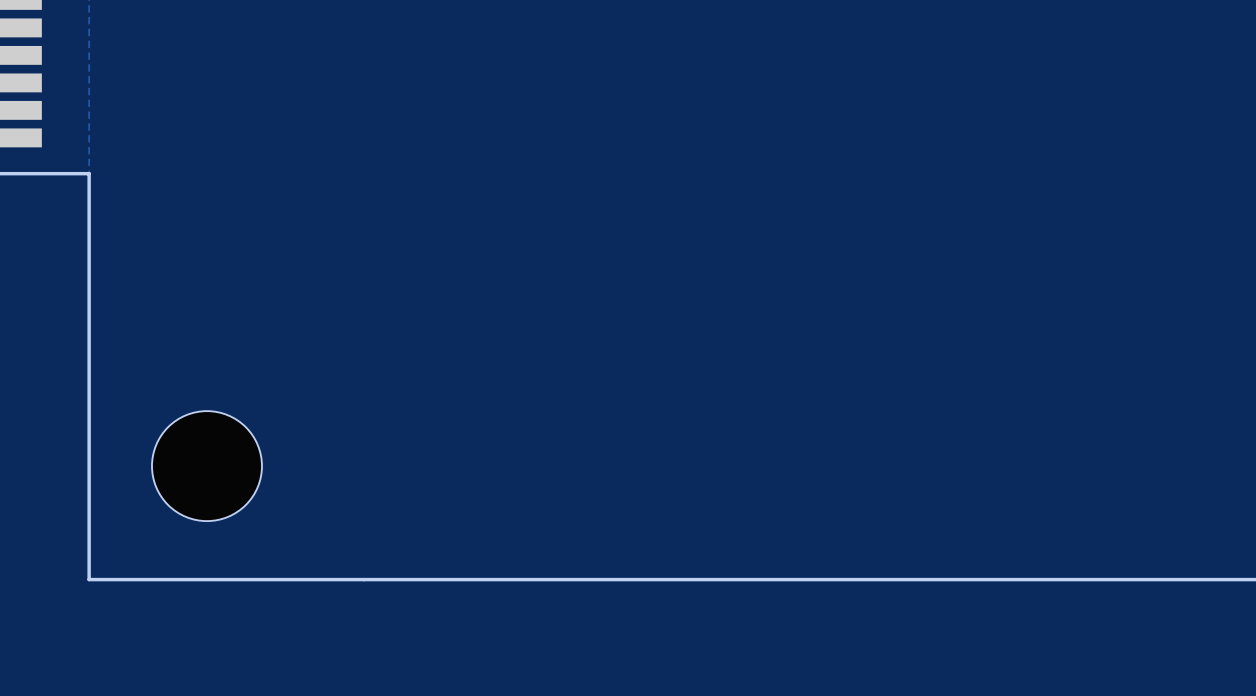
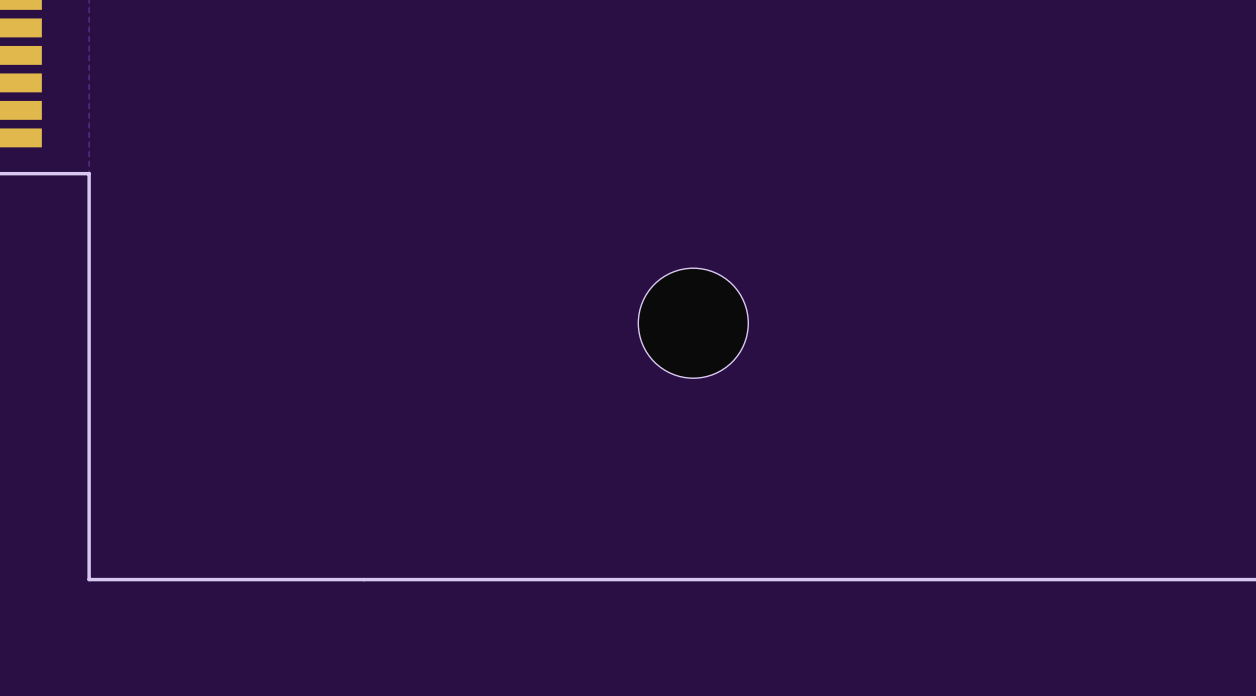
part position: (206, 466) -> (693, 323)

